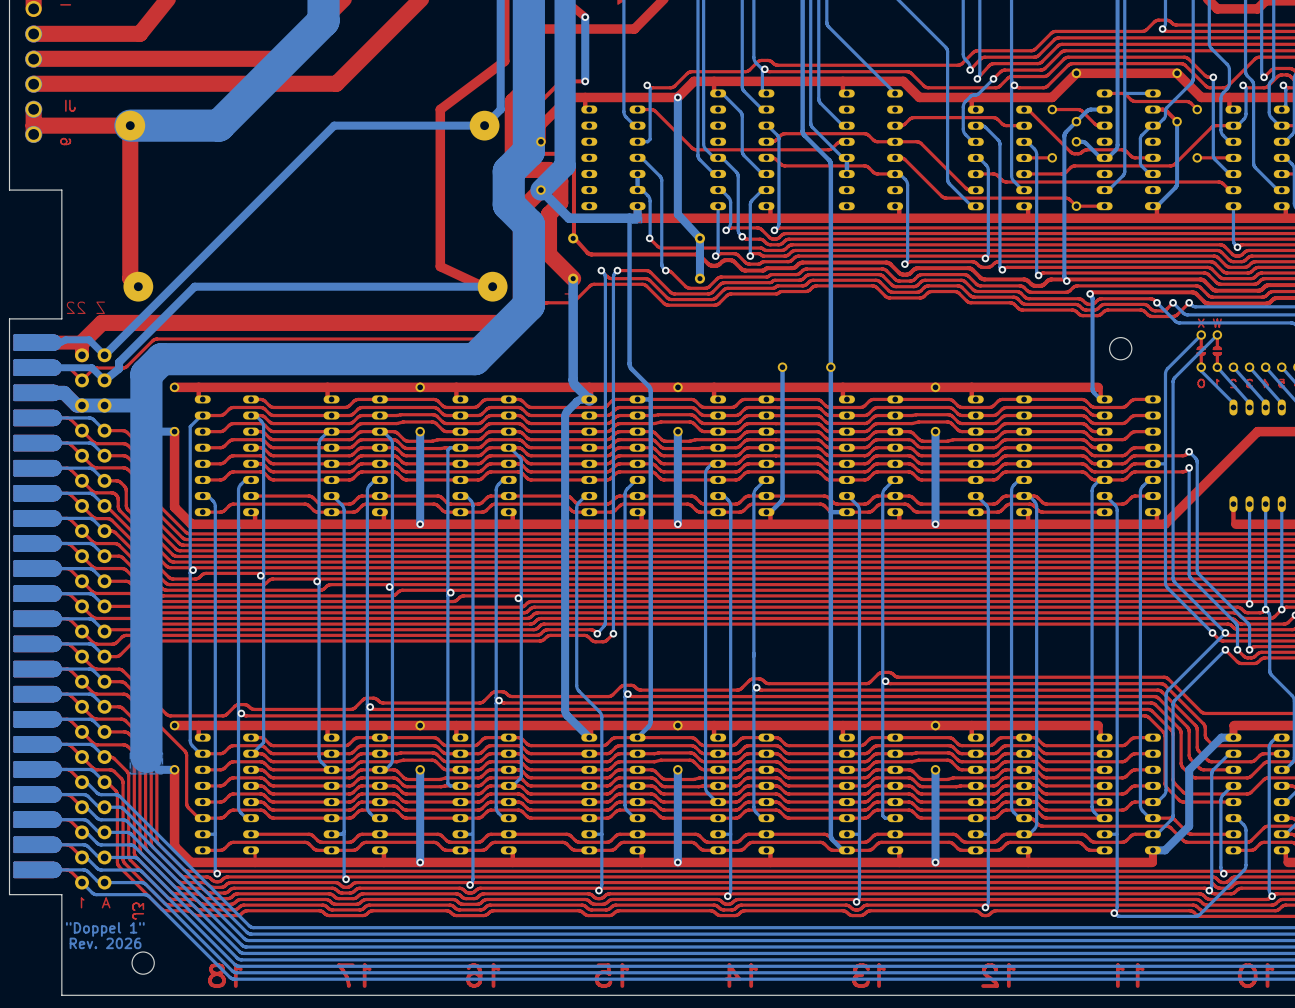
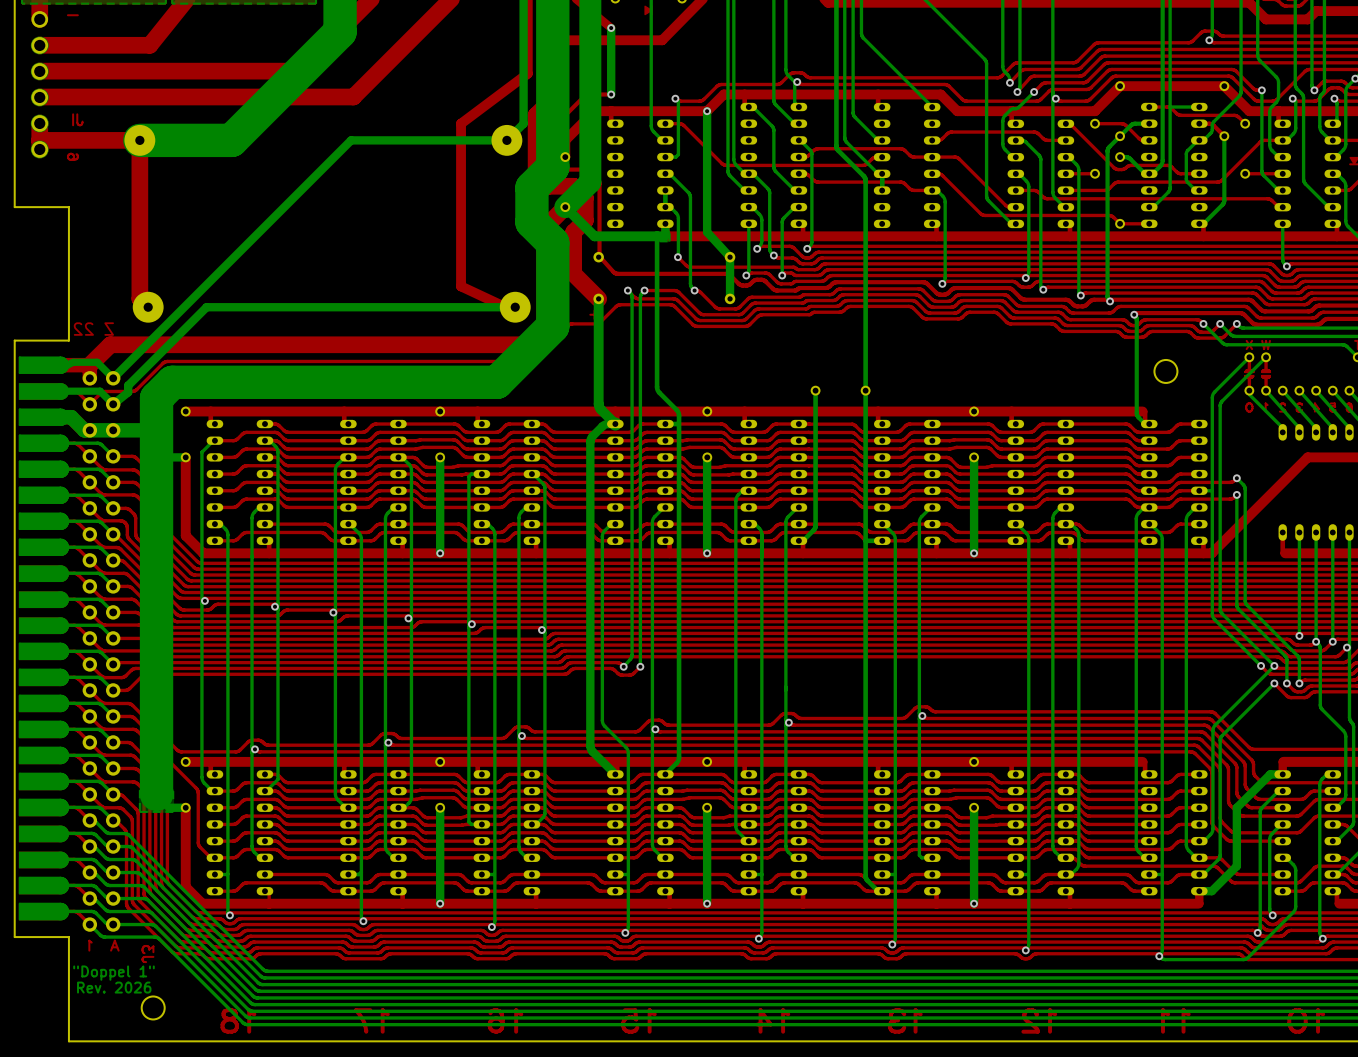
bottom track: (53, 360) (58, 361) (60, 366) (60, 370) (56, 374) (14, 375) (14, 360) (53, 360) -> none
bottom track: (53, 536) (58, 537) (60, 541) (60, 546) (56, 550) (14, 550) (14, 536) (53, 536) -> none
bottom track: (53, 561) (14, 561) -> none
bottom track: (53, 561) (58, 562) (60, 566) (60, 571) (56, 575) (14, 576) (14, 561) (53, 561) -> none
bottom track: (53, 586) (14, 586) (14, 601) (56, 600) (60, 596) (60, 592) (58, 587) (53, 586) -> none
part: none -> (41, 638)
bottom track: (53, 787) (14, 787) -> none
bottom track: (53, 787) (14, 787) (14, 802) (56, 801) (60, 797) (60, 792) (58, 788) (53, 787) -> none
bottom track: (53, 812) (14, 812) -> none
bottom track: (53, 812) (58, 813) (60, 818) (60, 822) (56, 826) (14, 827) (14, 812) (53, 812) -> none

